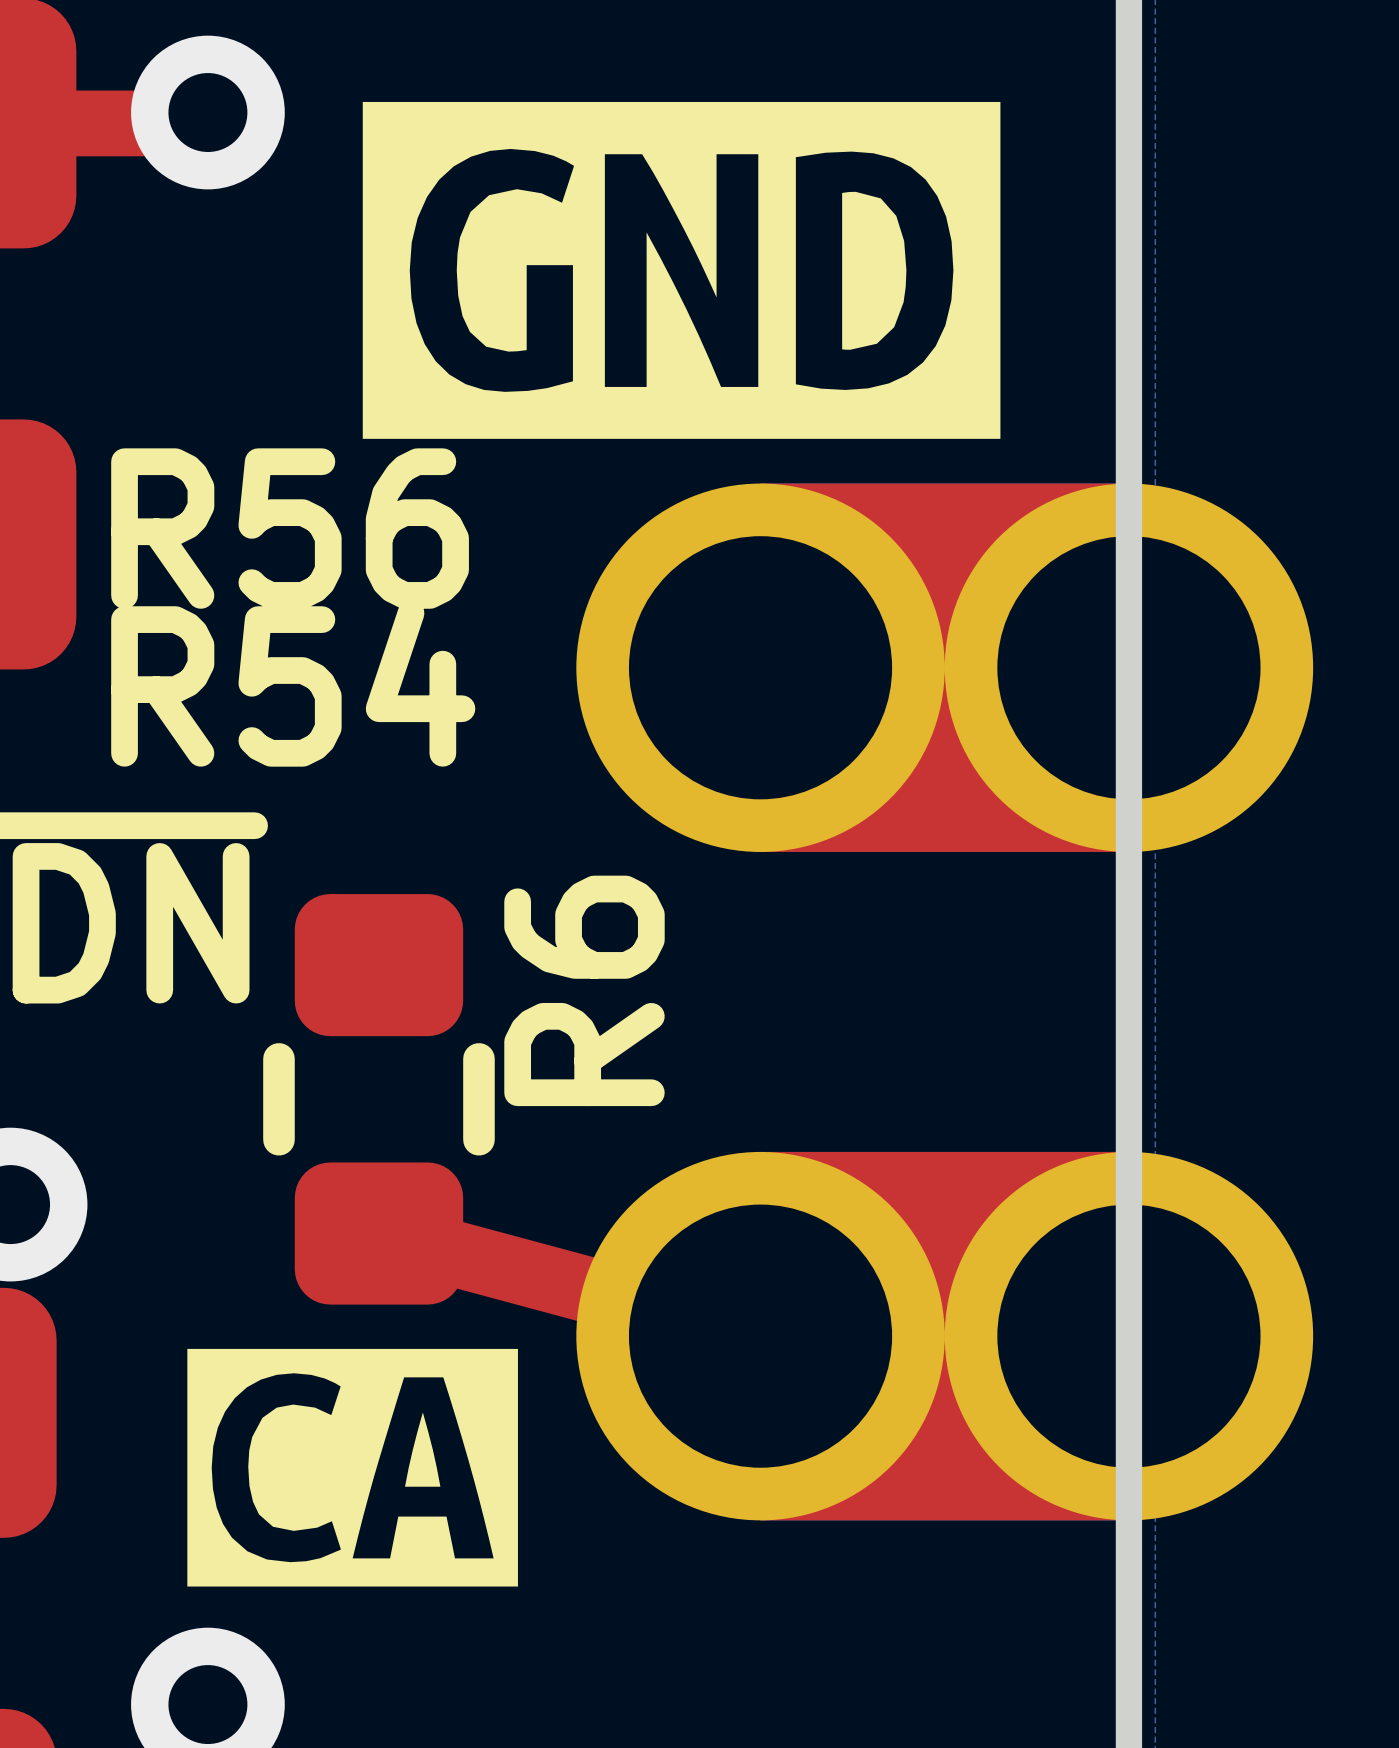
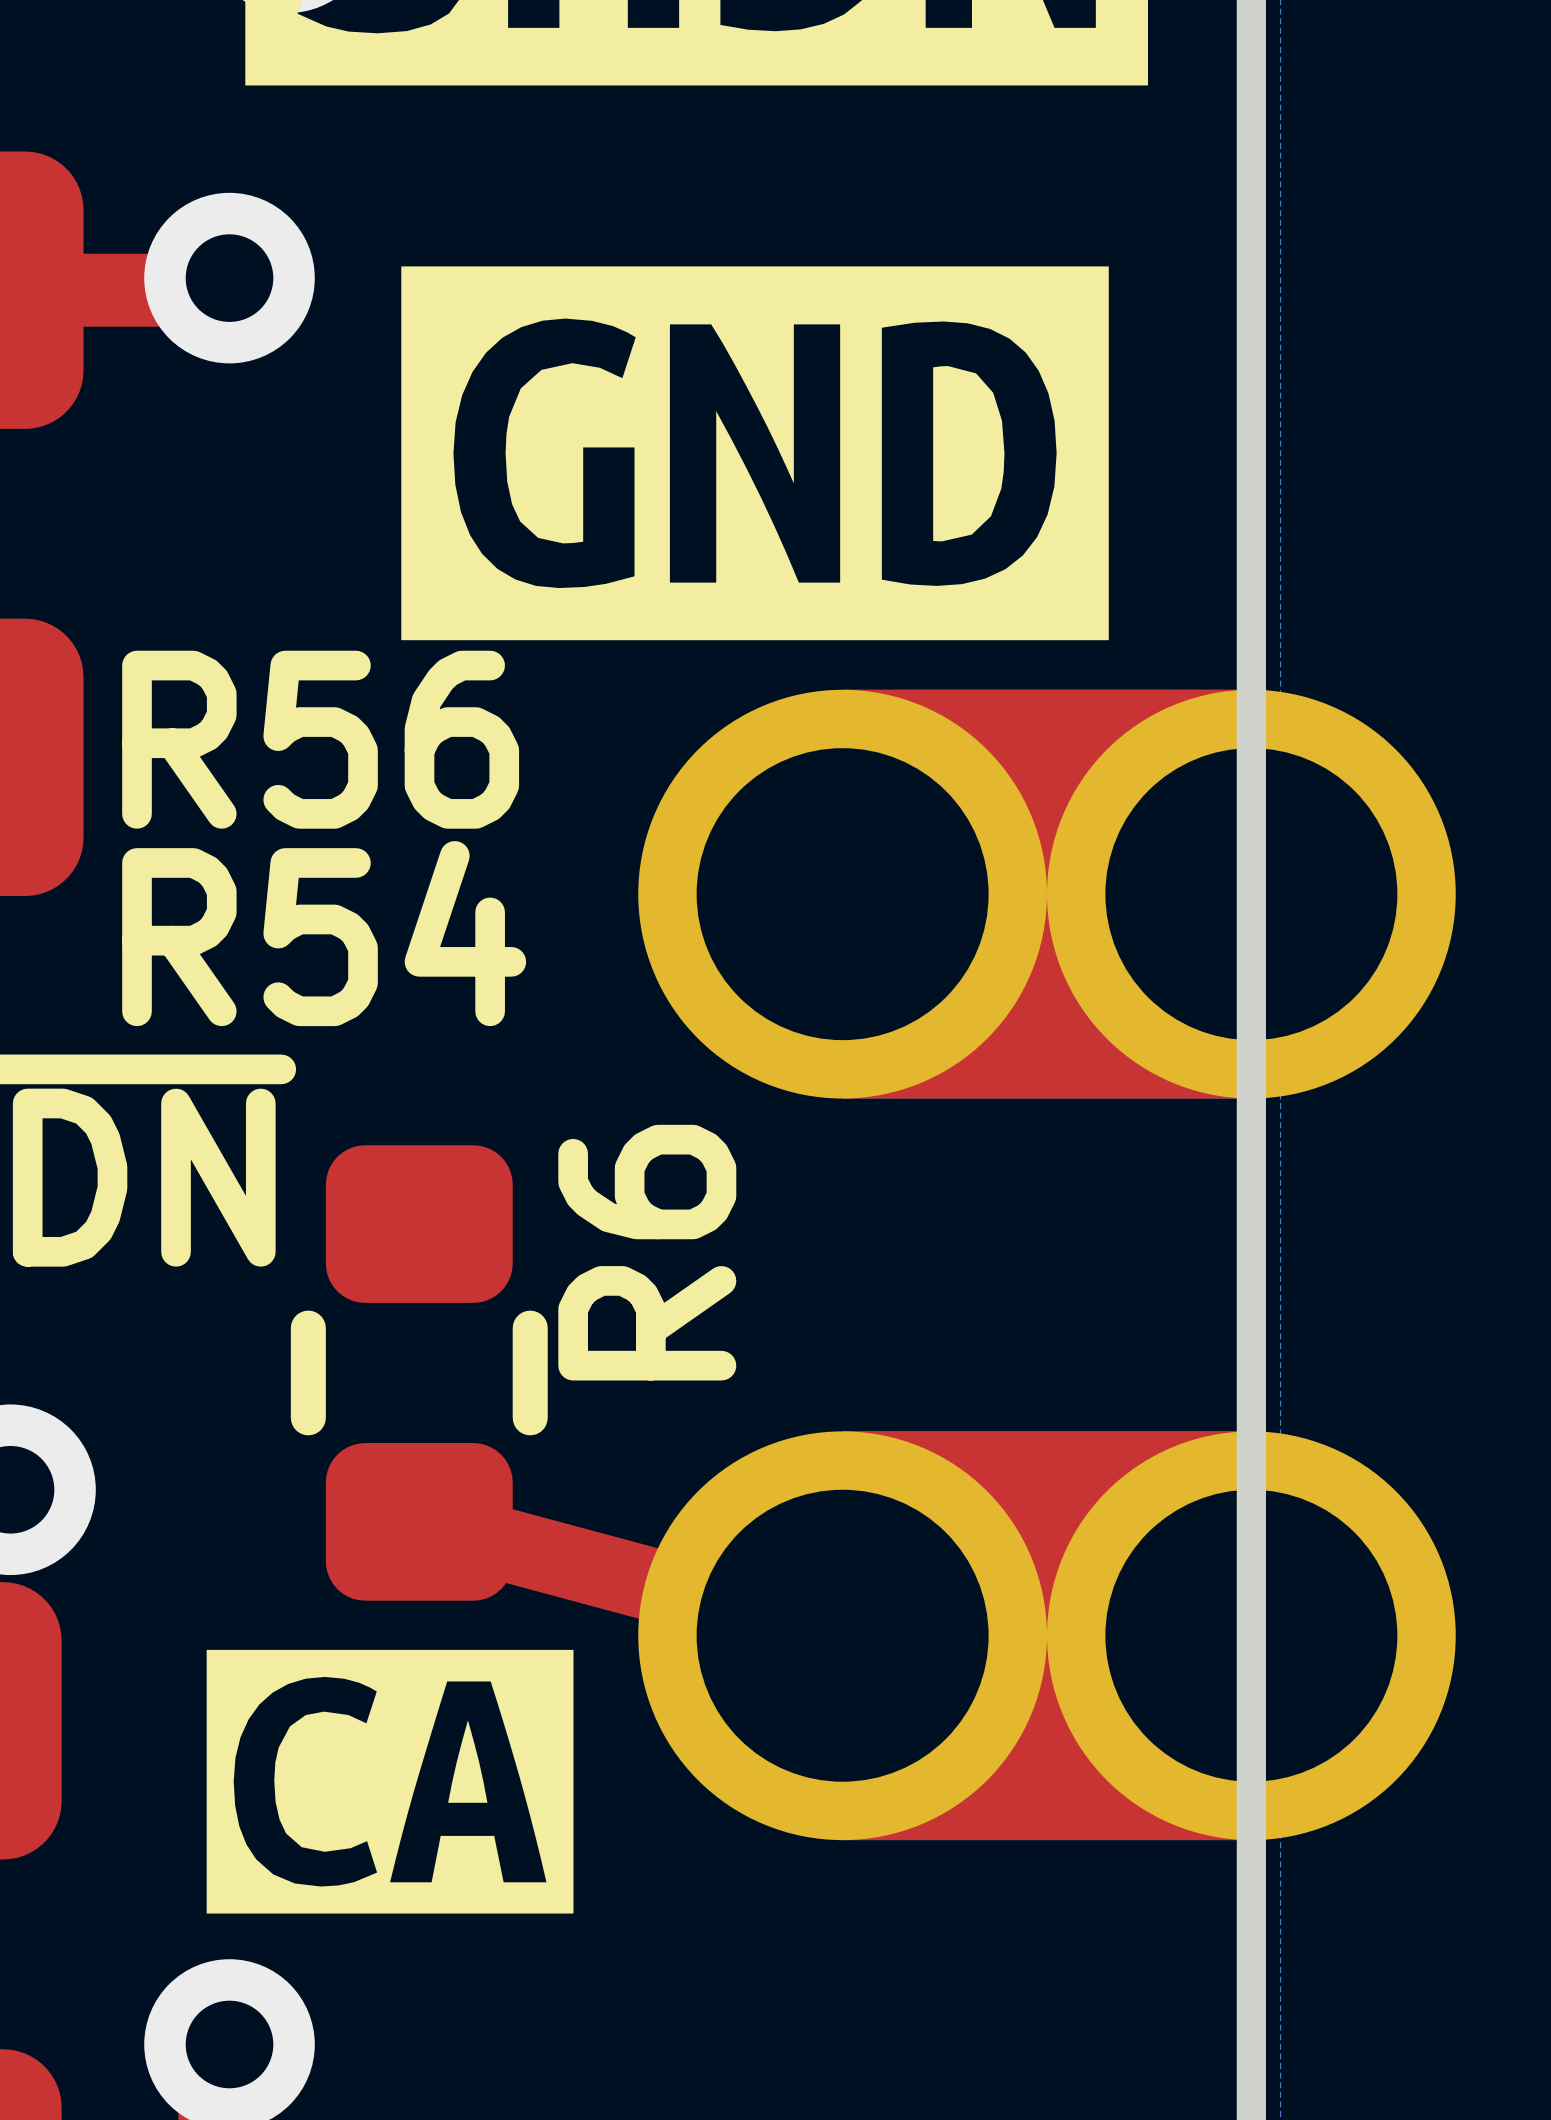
R54 name position: R54 (293, 683) -> R54 (324, 933)

